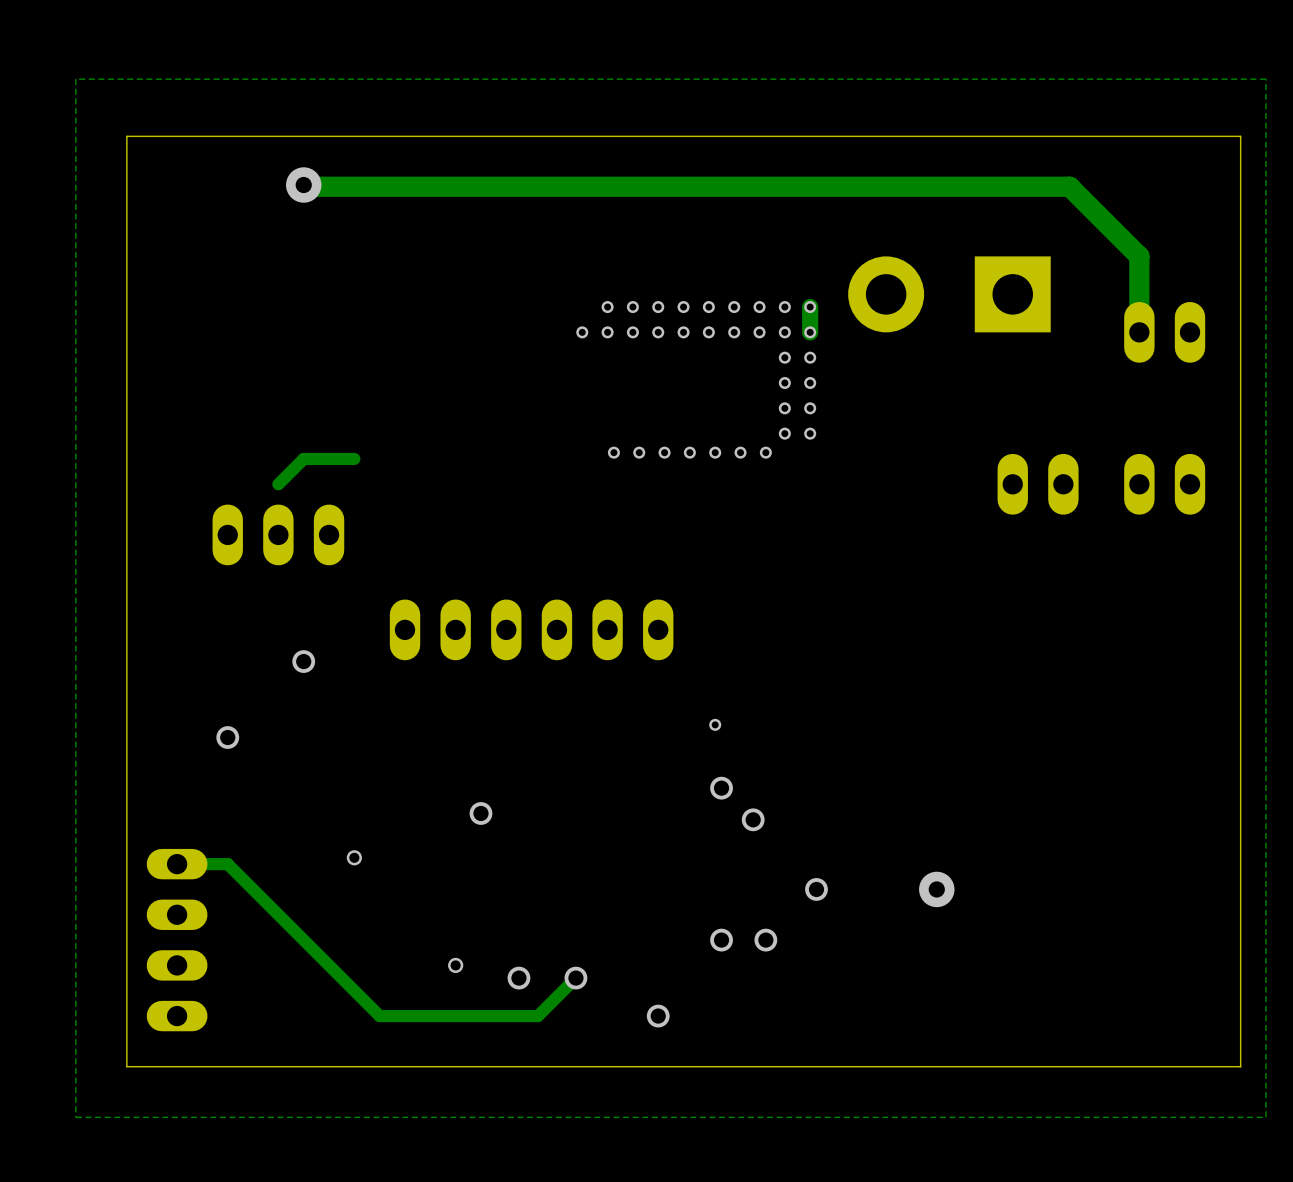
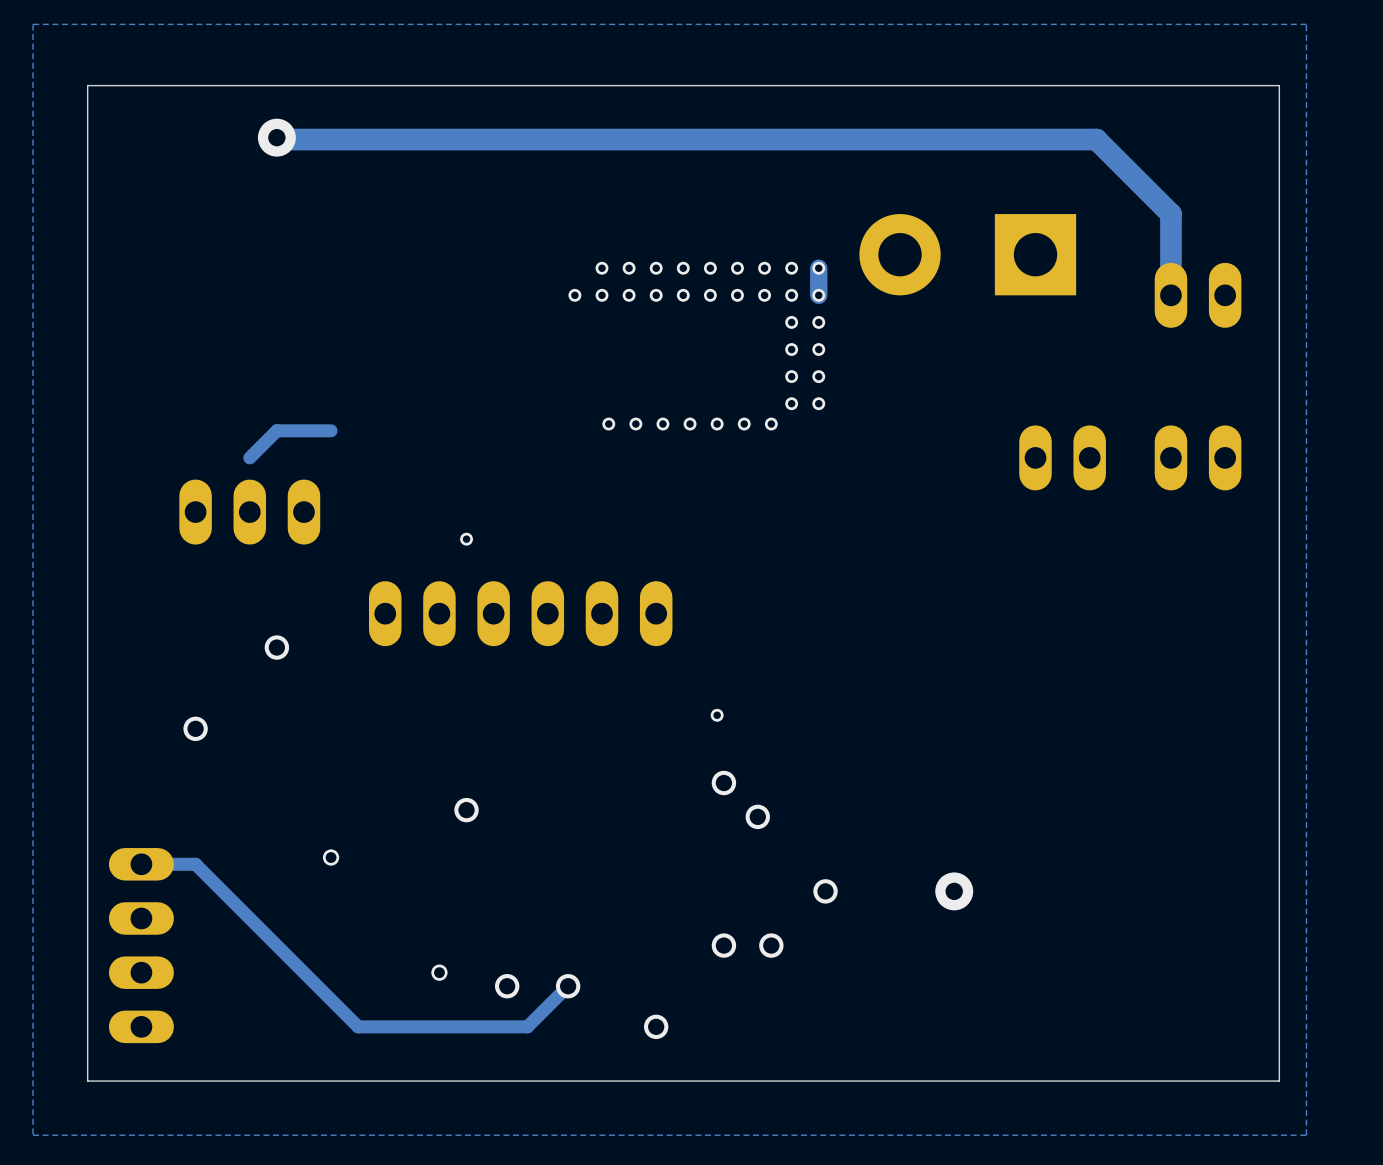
via: none -> (466, 539)

